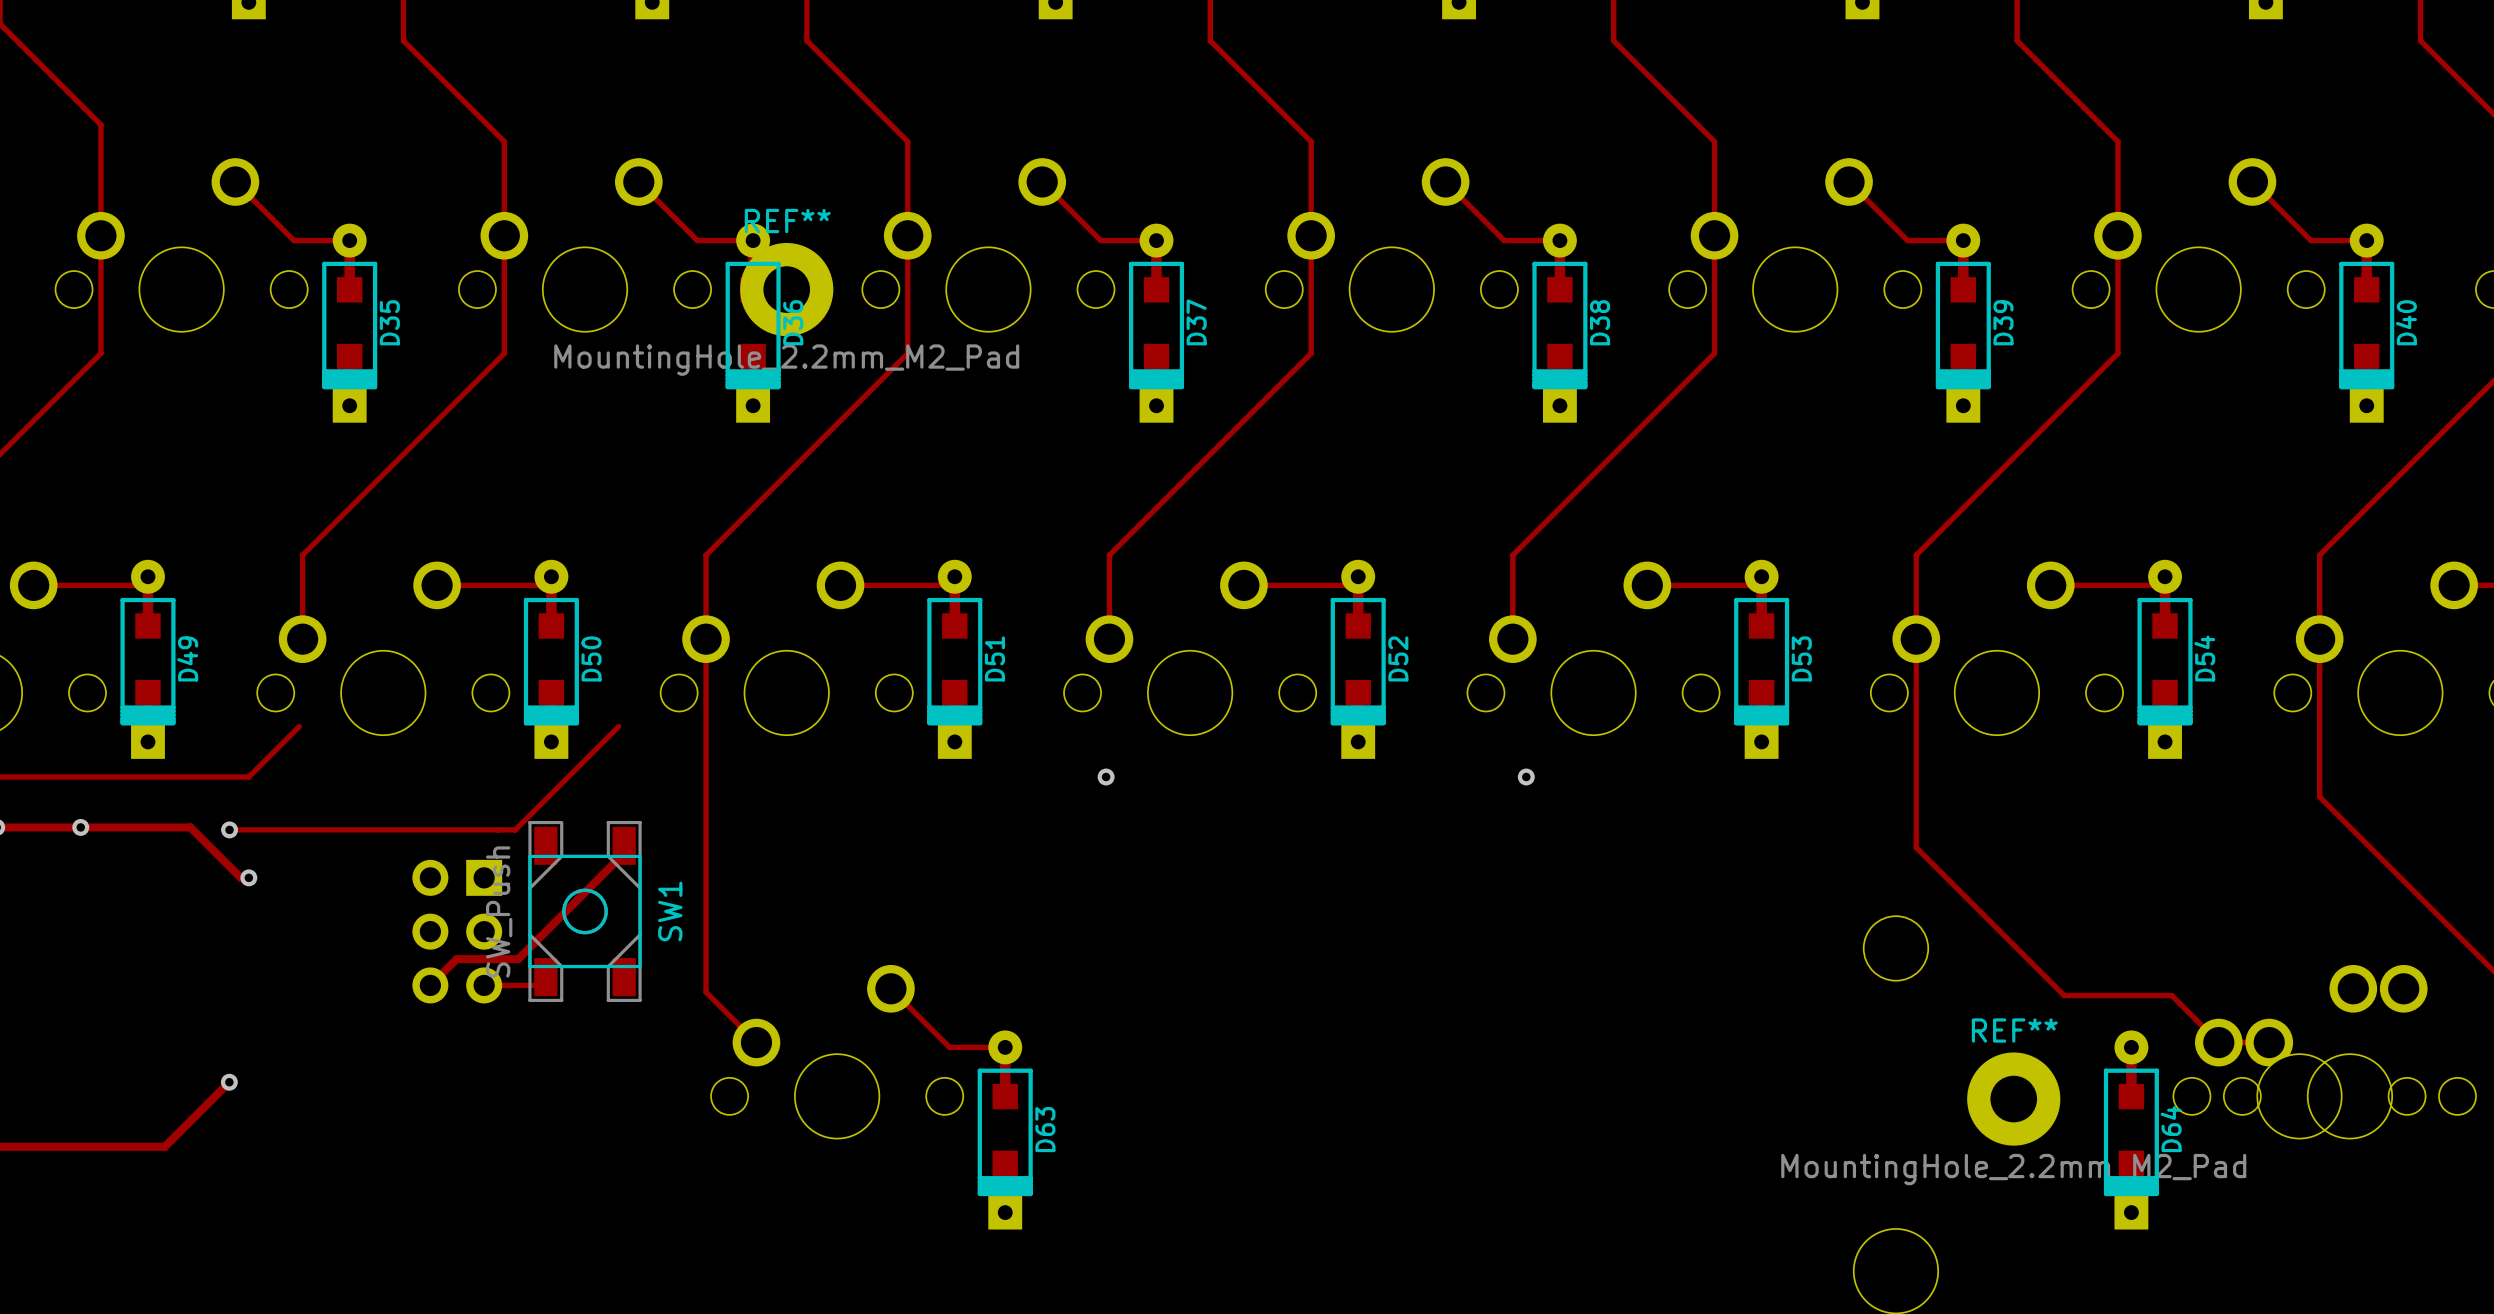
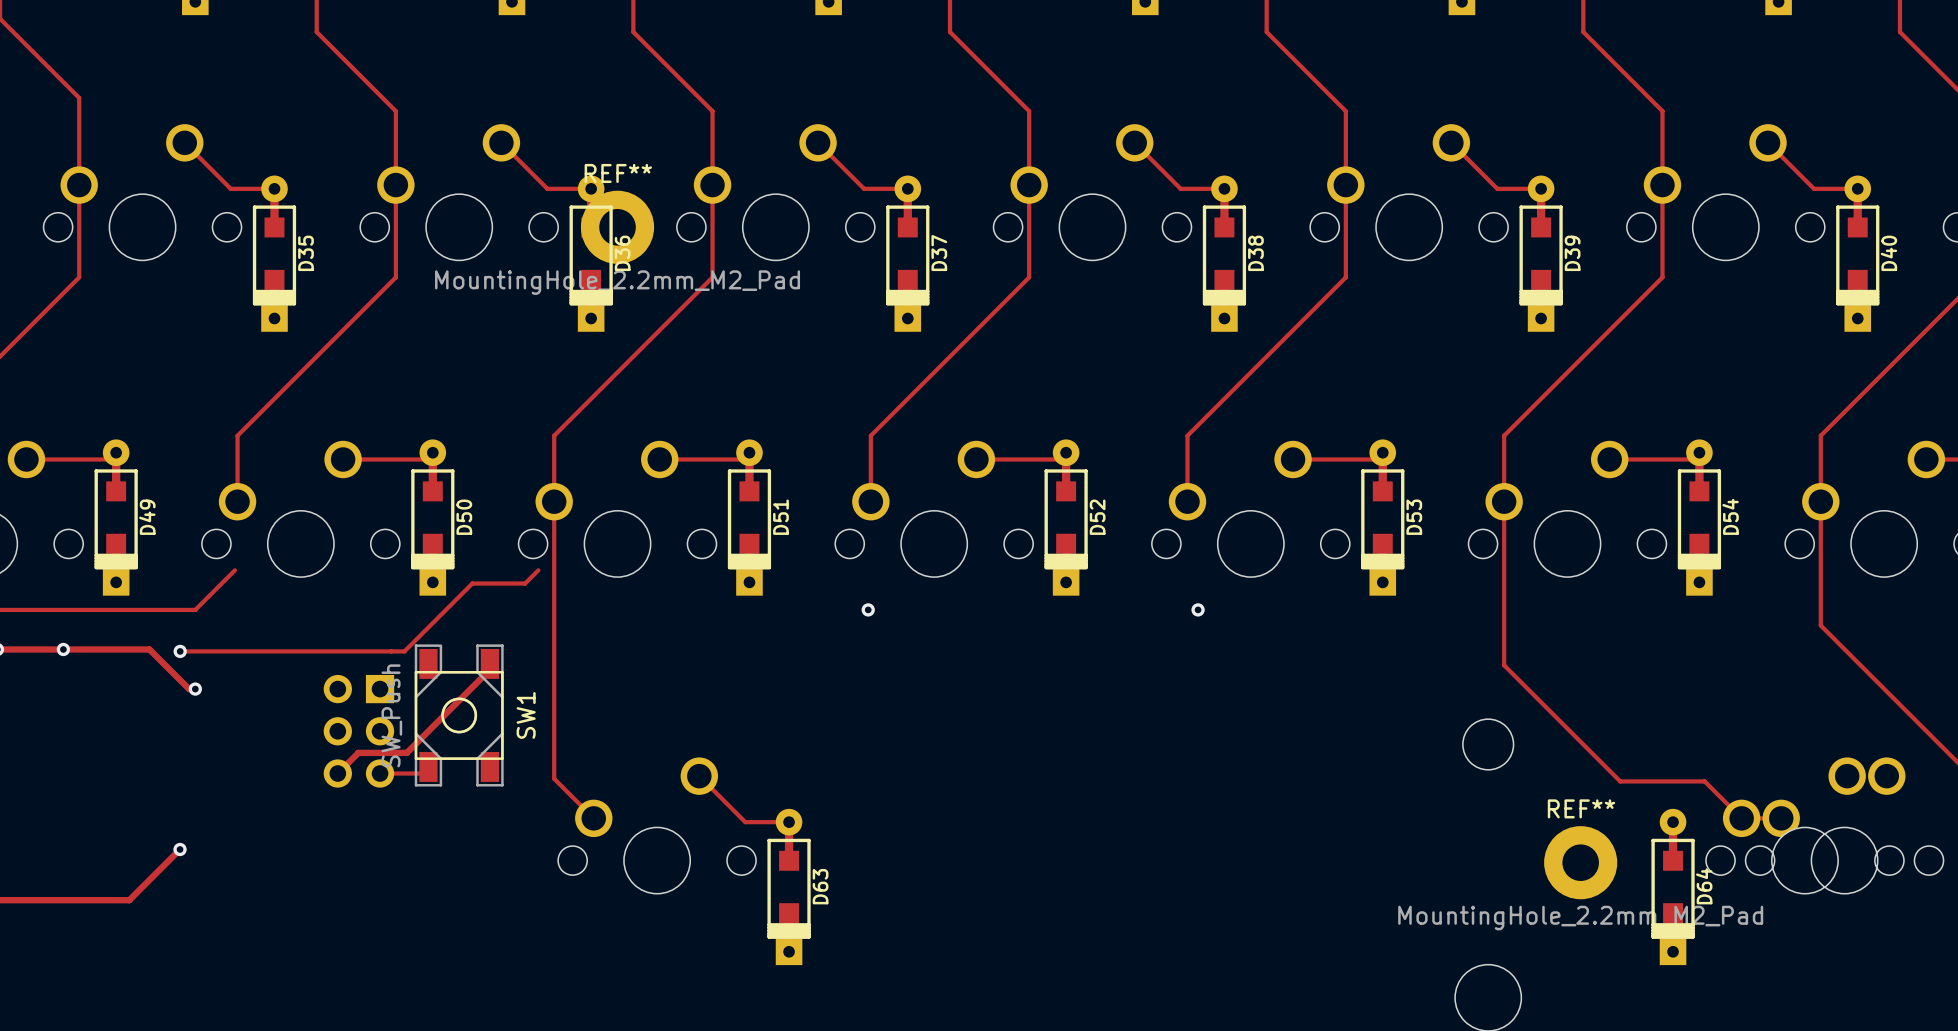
track: (618, 726) (601, 743) -> (538, 570) (525, 583) (472, 583)

